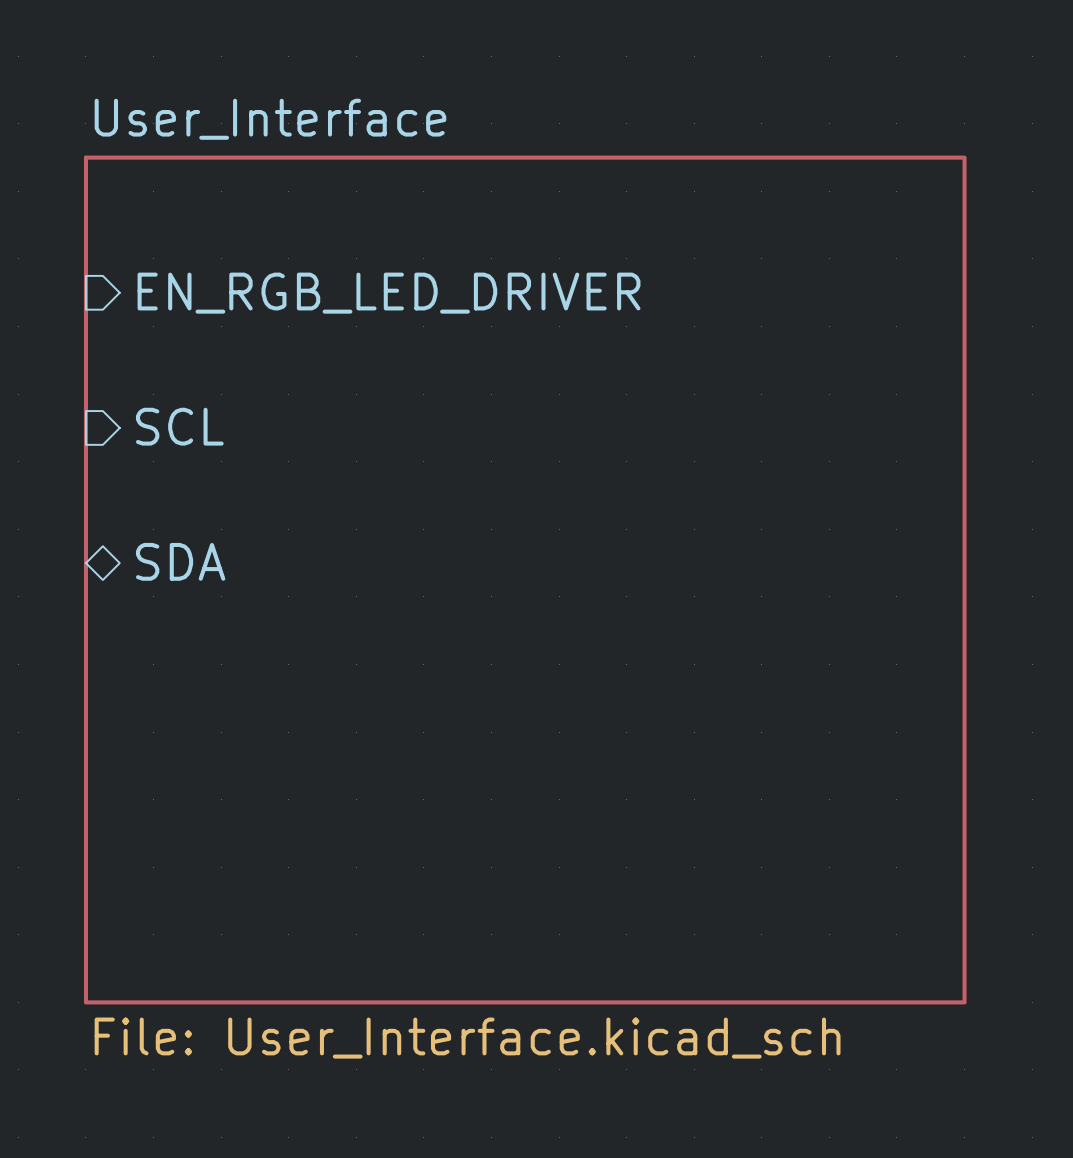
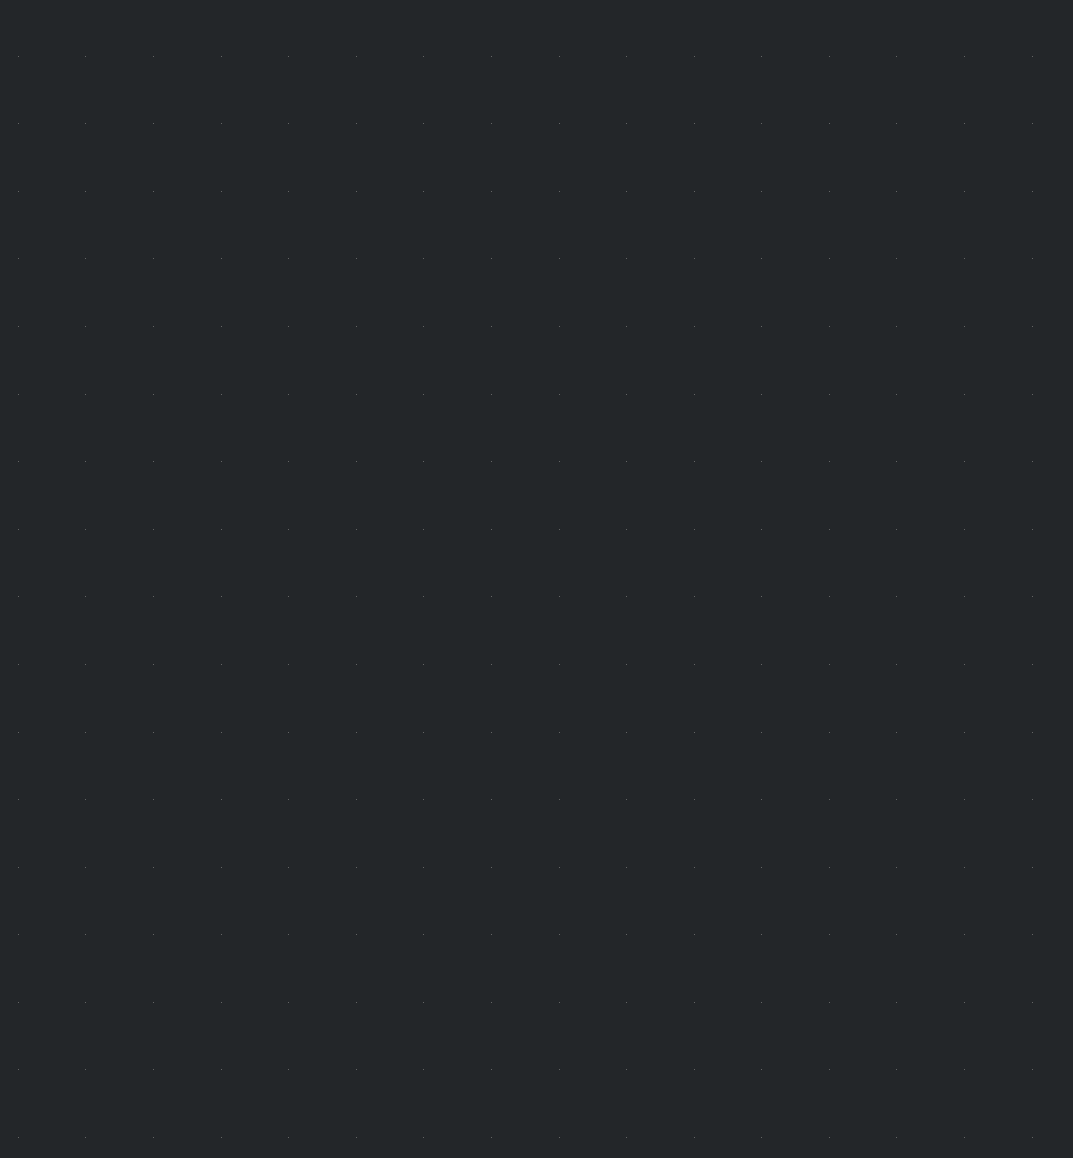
sheet pin: EN_RGB_LED_DRIVER (389, 293) -> none
sheet pin: SCL (179, 426) -> none
sheet pin: SDA (180, 561) -> none
sheet User_Interface: File: User_Interface.kicad_sch (525, 580) -> none

